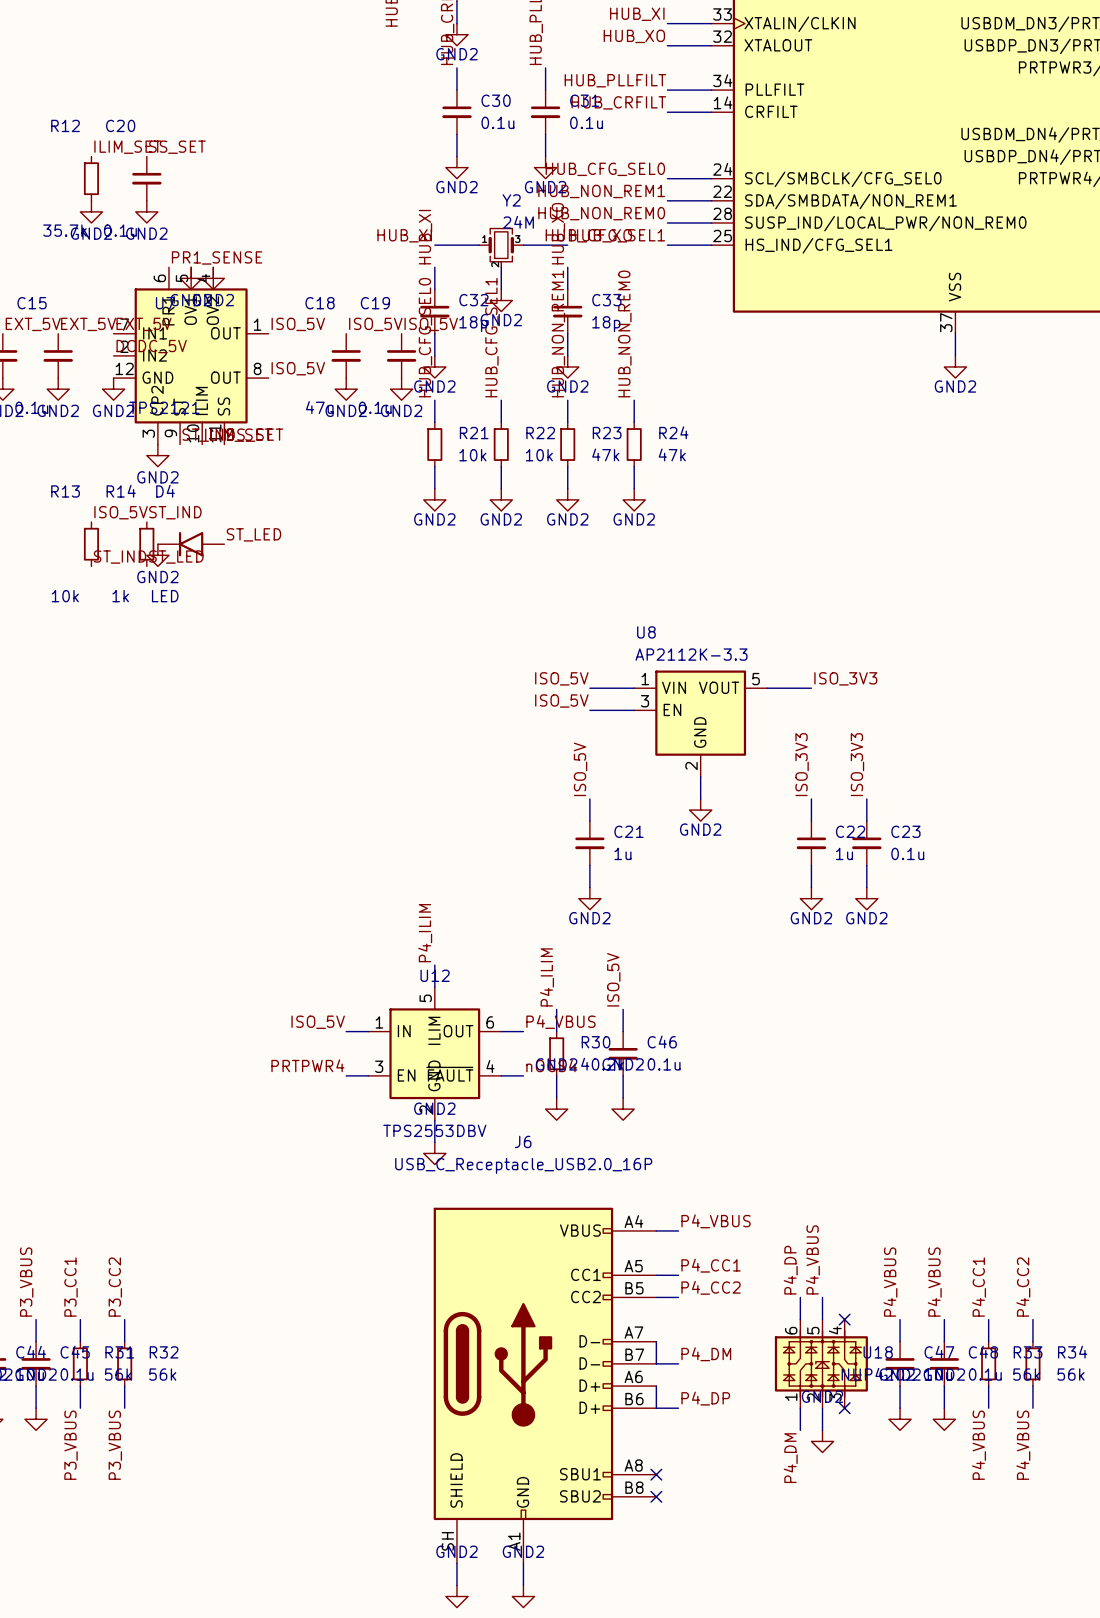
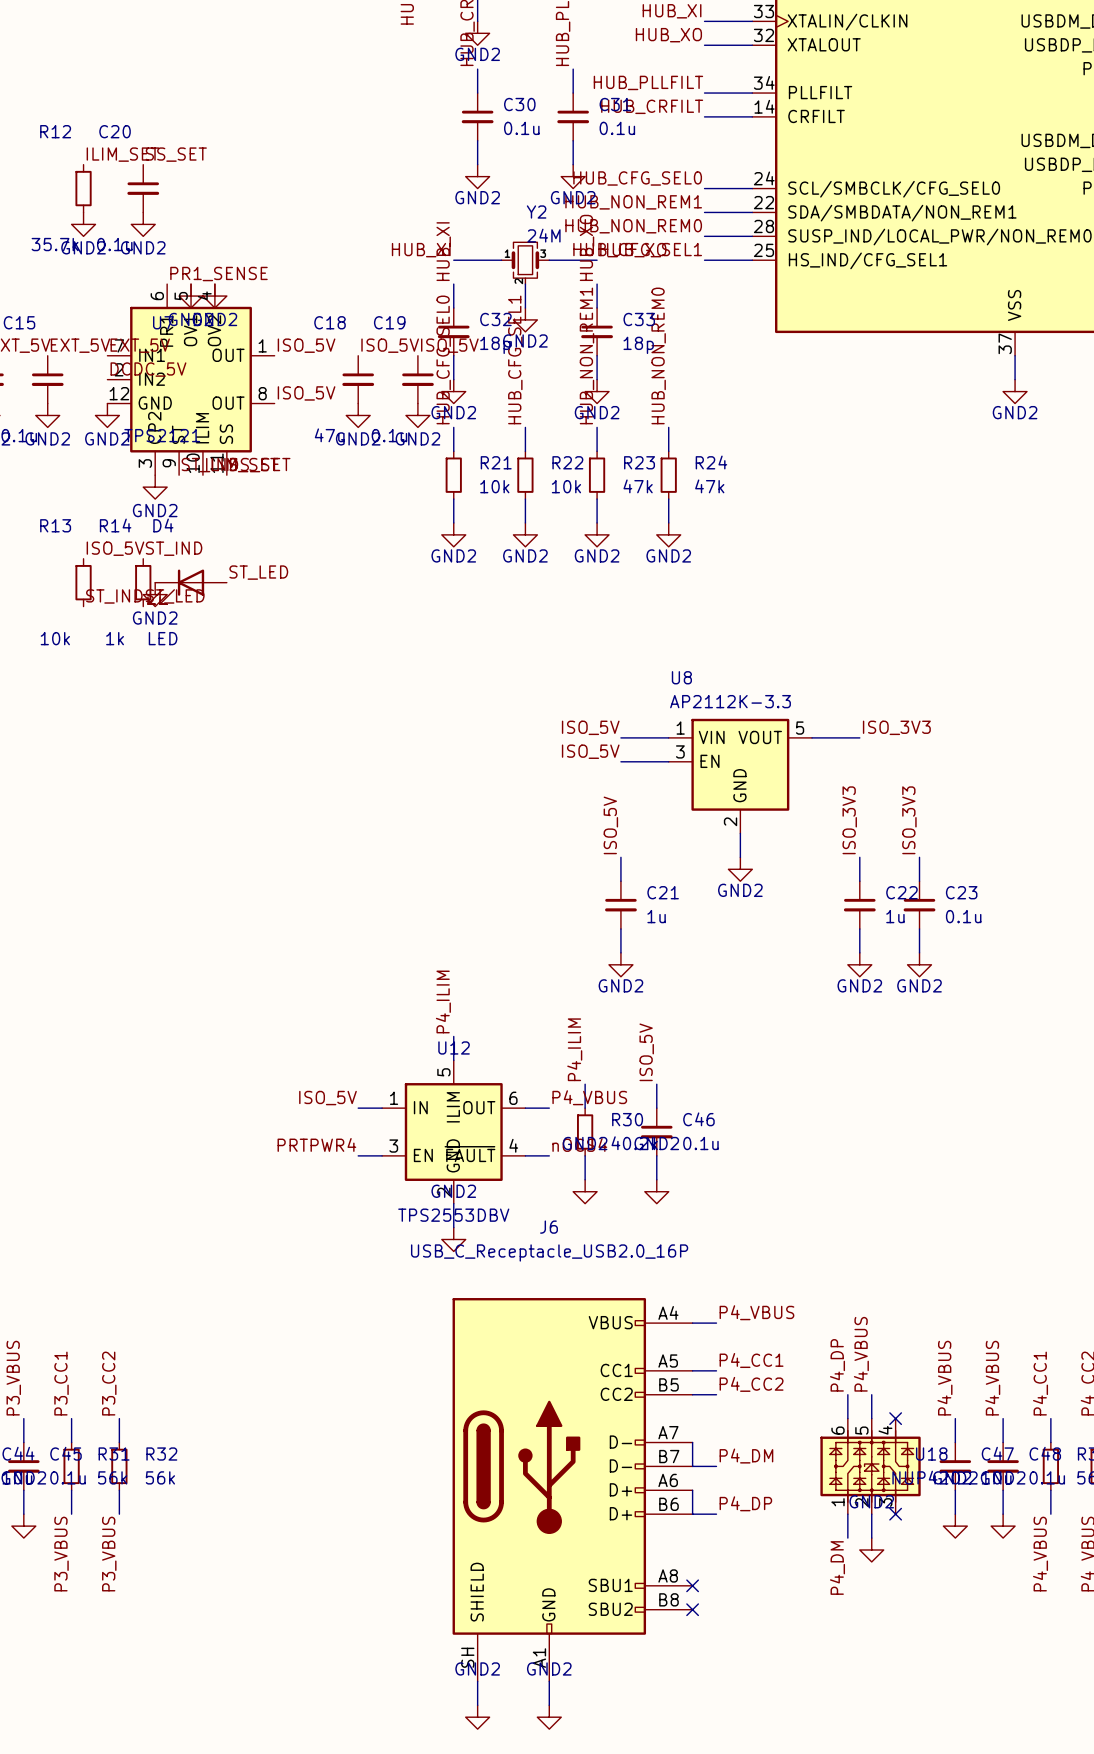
D4 symbol: [157, 532, 225, 557] -> [148, 569, 227, 605]

